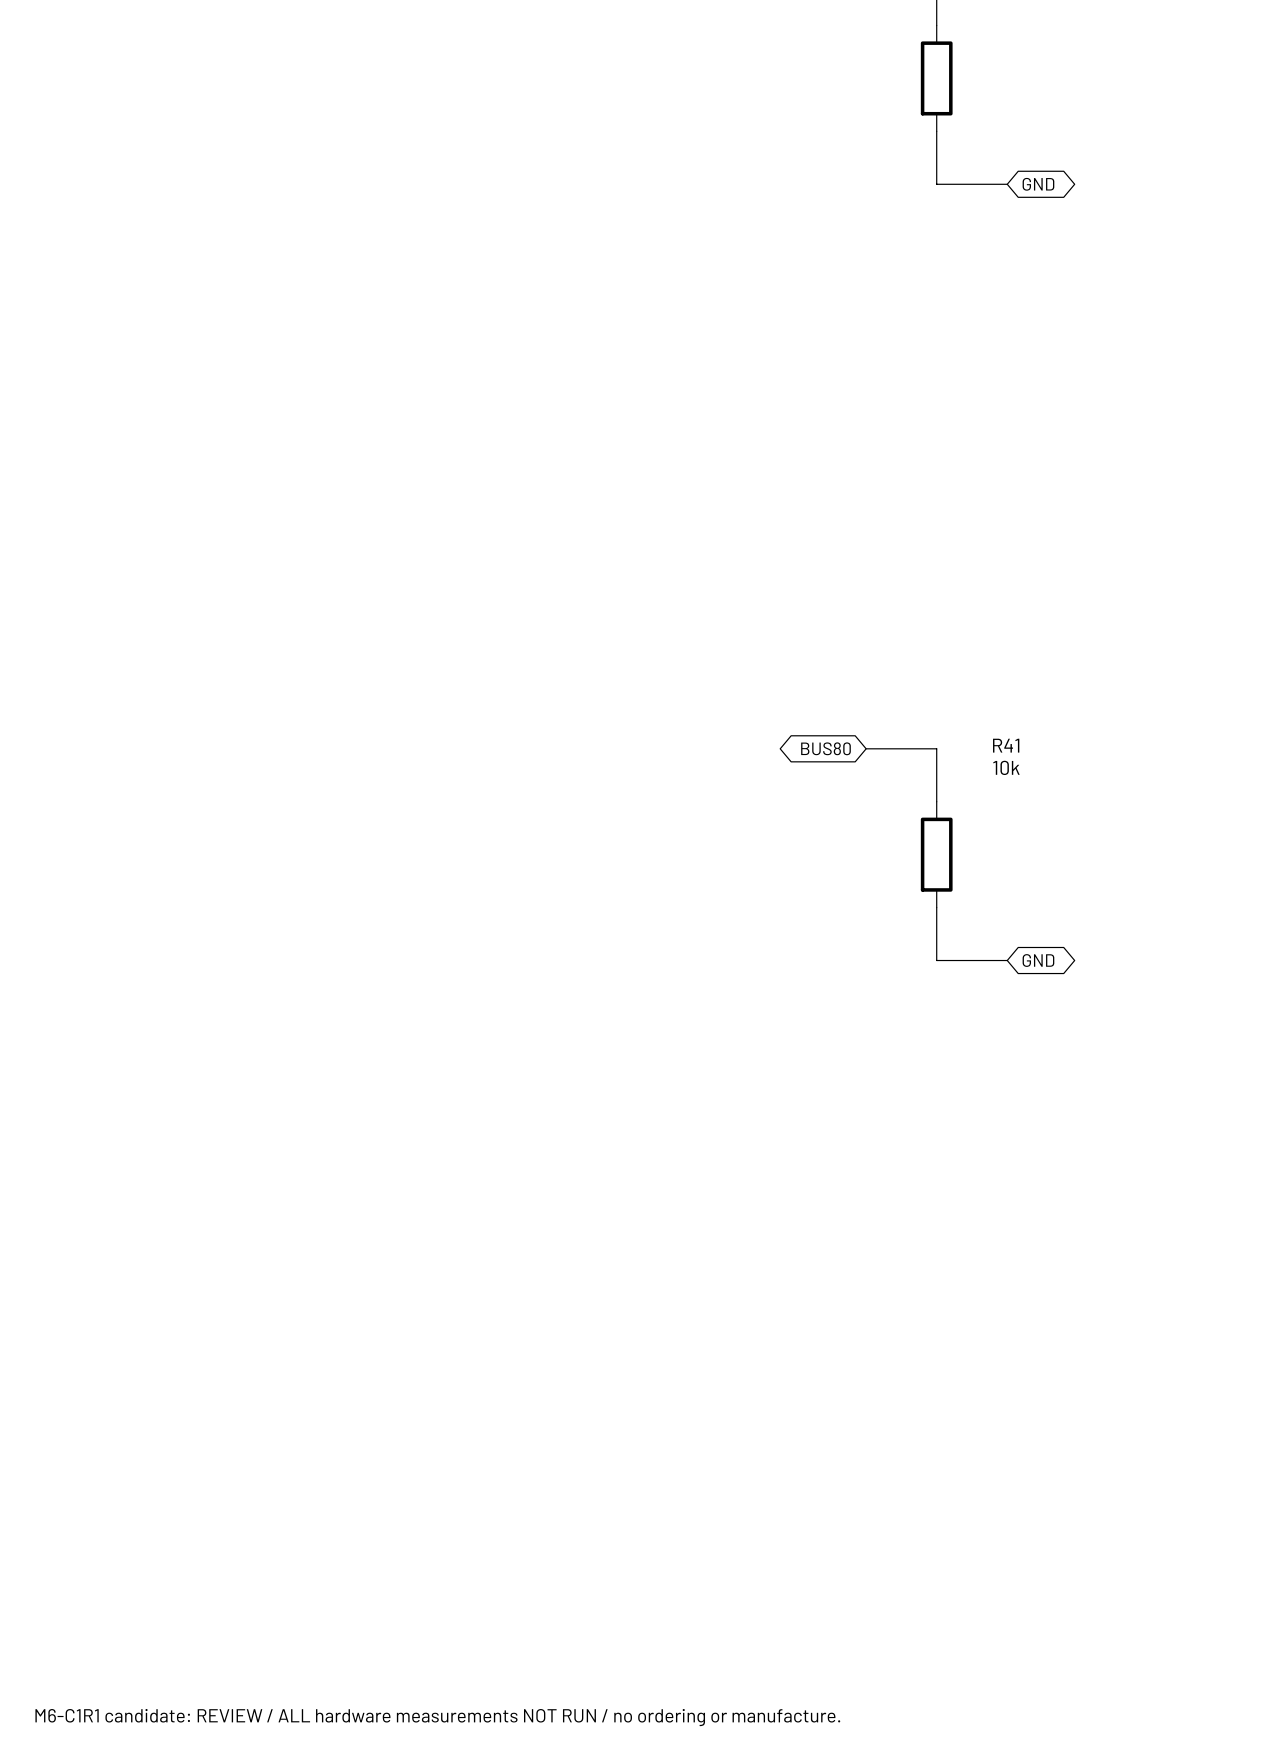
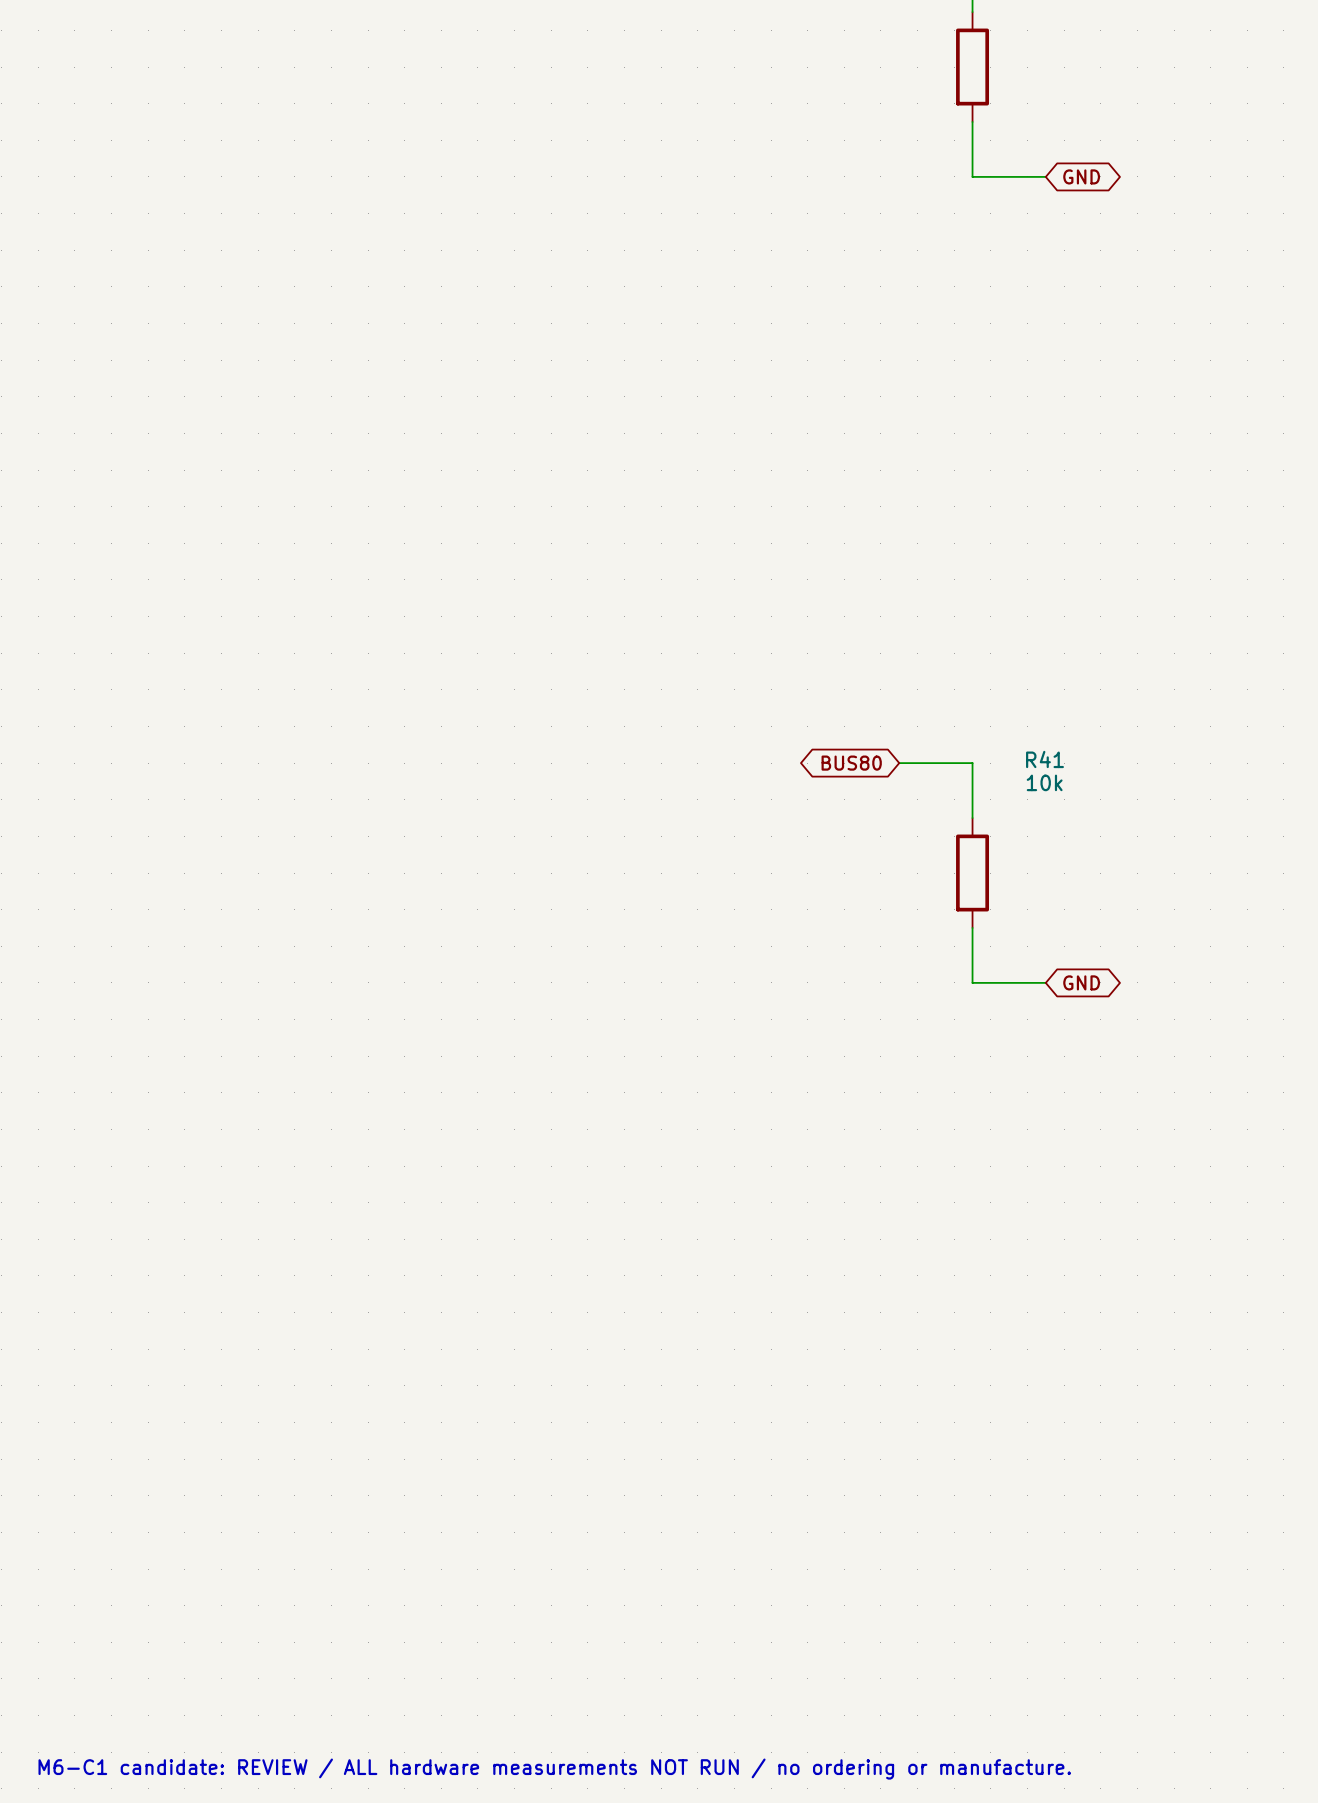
text: M6-C1R1 candidate: REVIEW / ALL hardware measurements NOT RUN / no ordering or manufacture. (437, 1717) -> M6-C1 candidate: REVIEW / ALL hardware measurements NOT RUN / no ordering or manufacture. (554, 1769)

